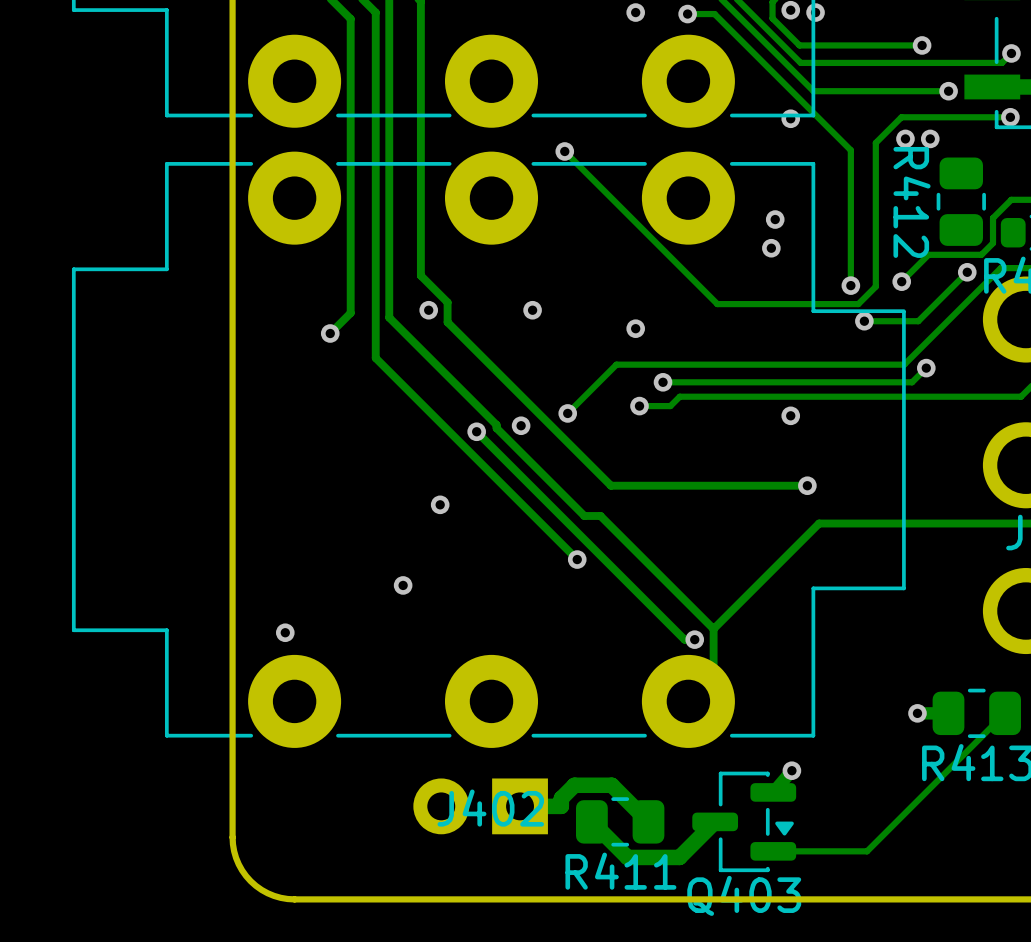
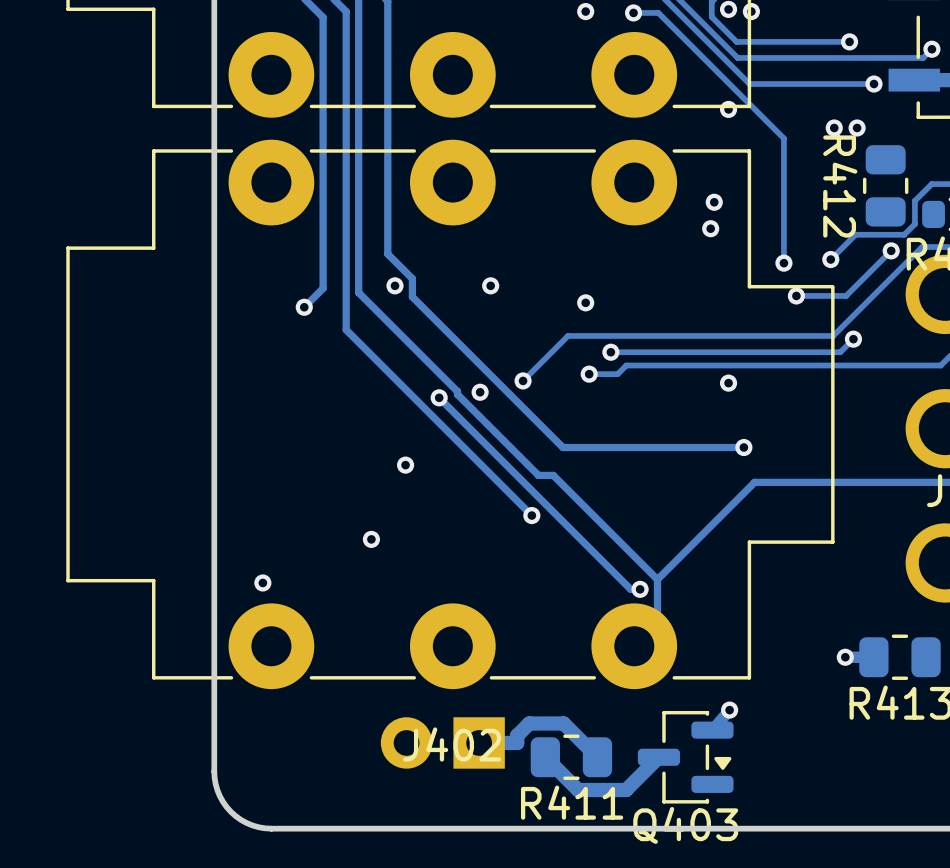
track: (1010, 117) (901, 117) (875, 142) (875, 286) (858, 304) (717, 304) (564, 151) -> none
via: (1010, 117) -> none
via: (564, 151) -> none
track: (1005, 713) (867, 851) (773, 851) -> none

